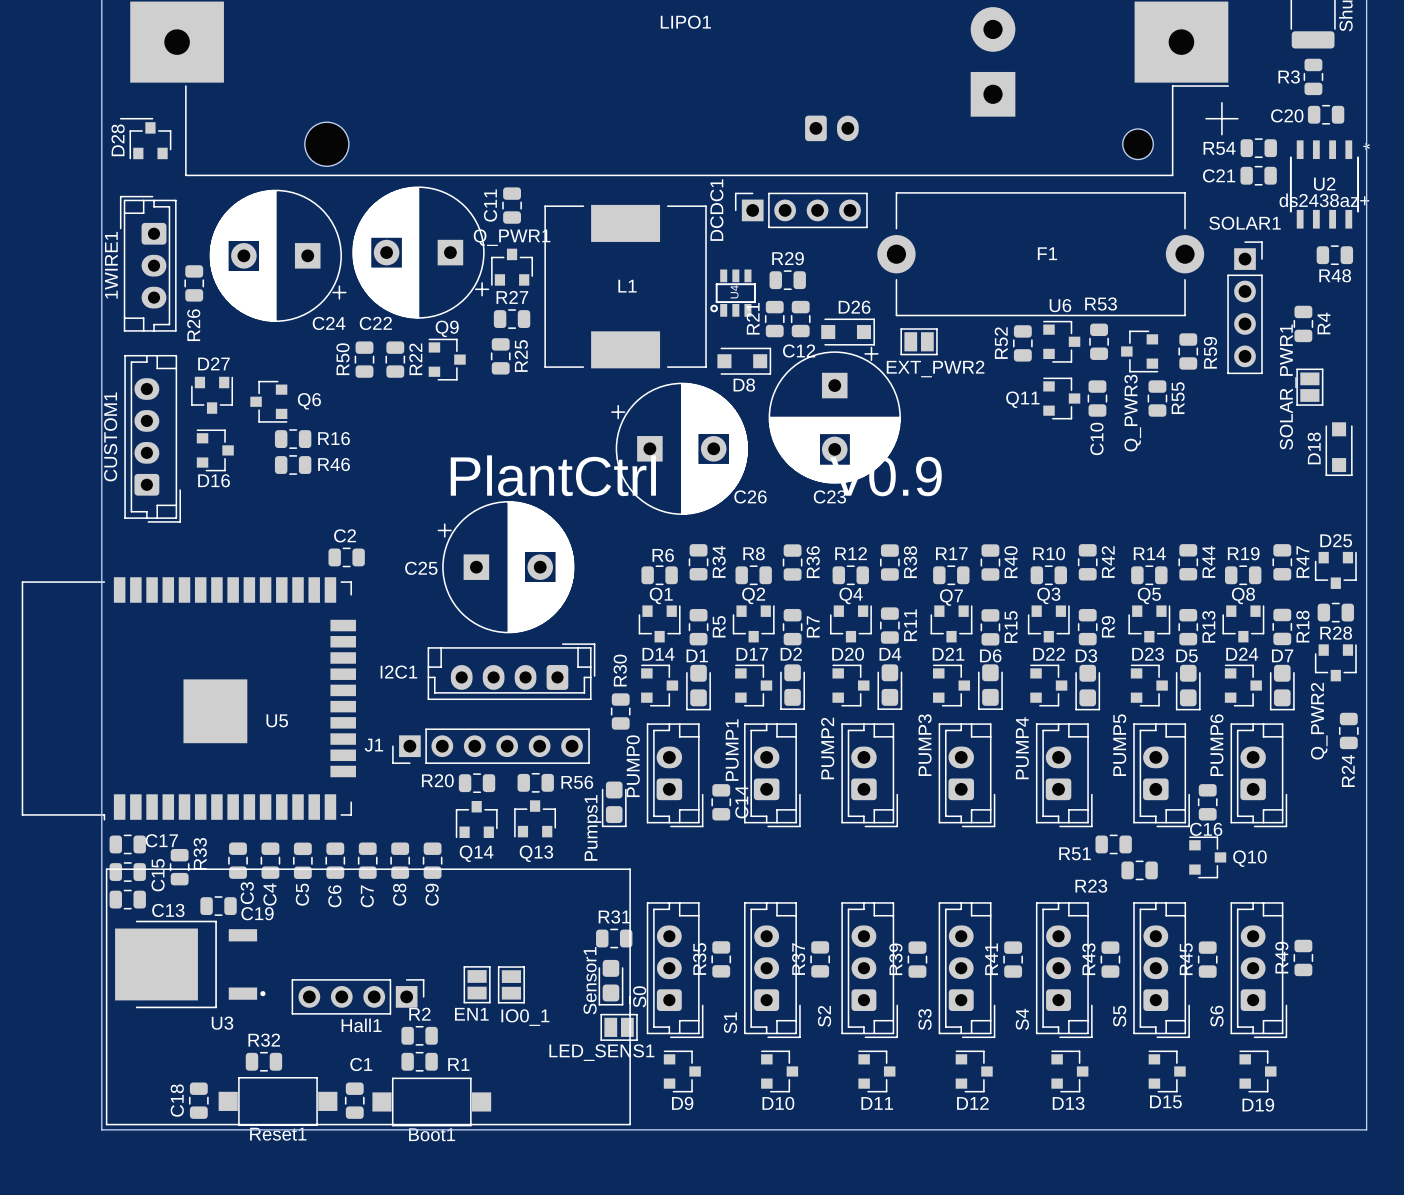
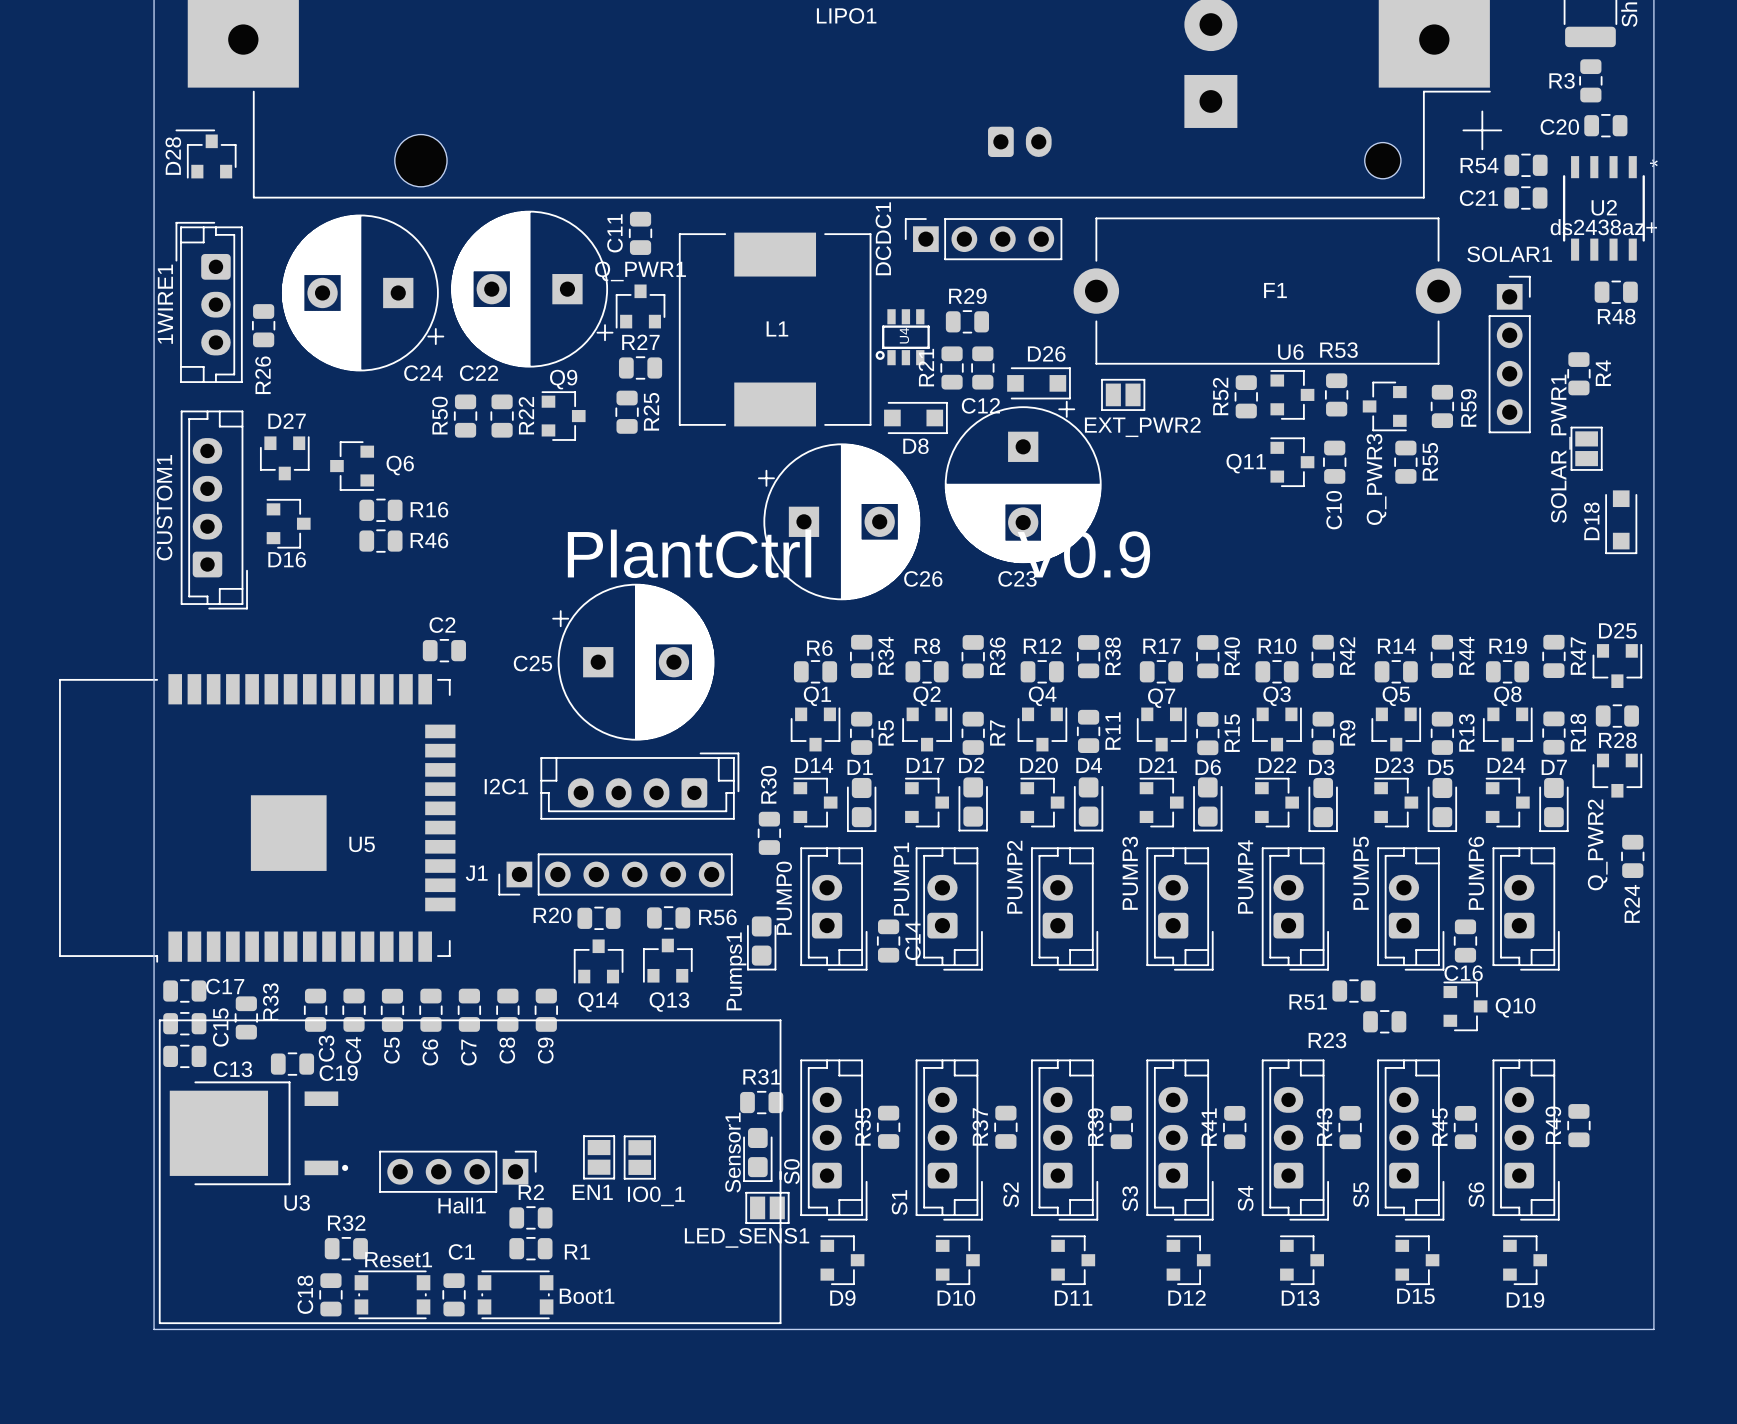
Reset1 footprint: [218, 1077, 338, 1126] -> [354, 1270, 431, 1320]
Boot1 footprint: [372, 1077, 492, 1127] -> [477, 1270, 554, 1320]
C18 position: (198, 1100) -> (330, 1294)
Reset1 name position: Reset1 (278, 1134) -> Reset1 (398, 1259)
Boot1 name position: Boot1 (432, 1134) -> Boot1 (587, 1296)

